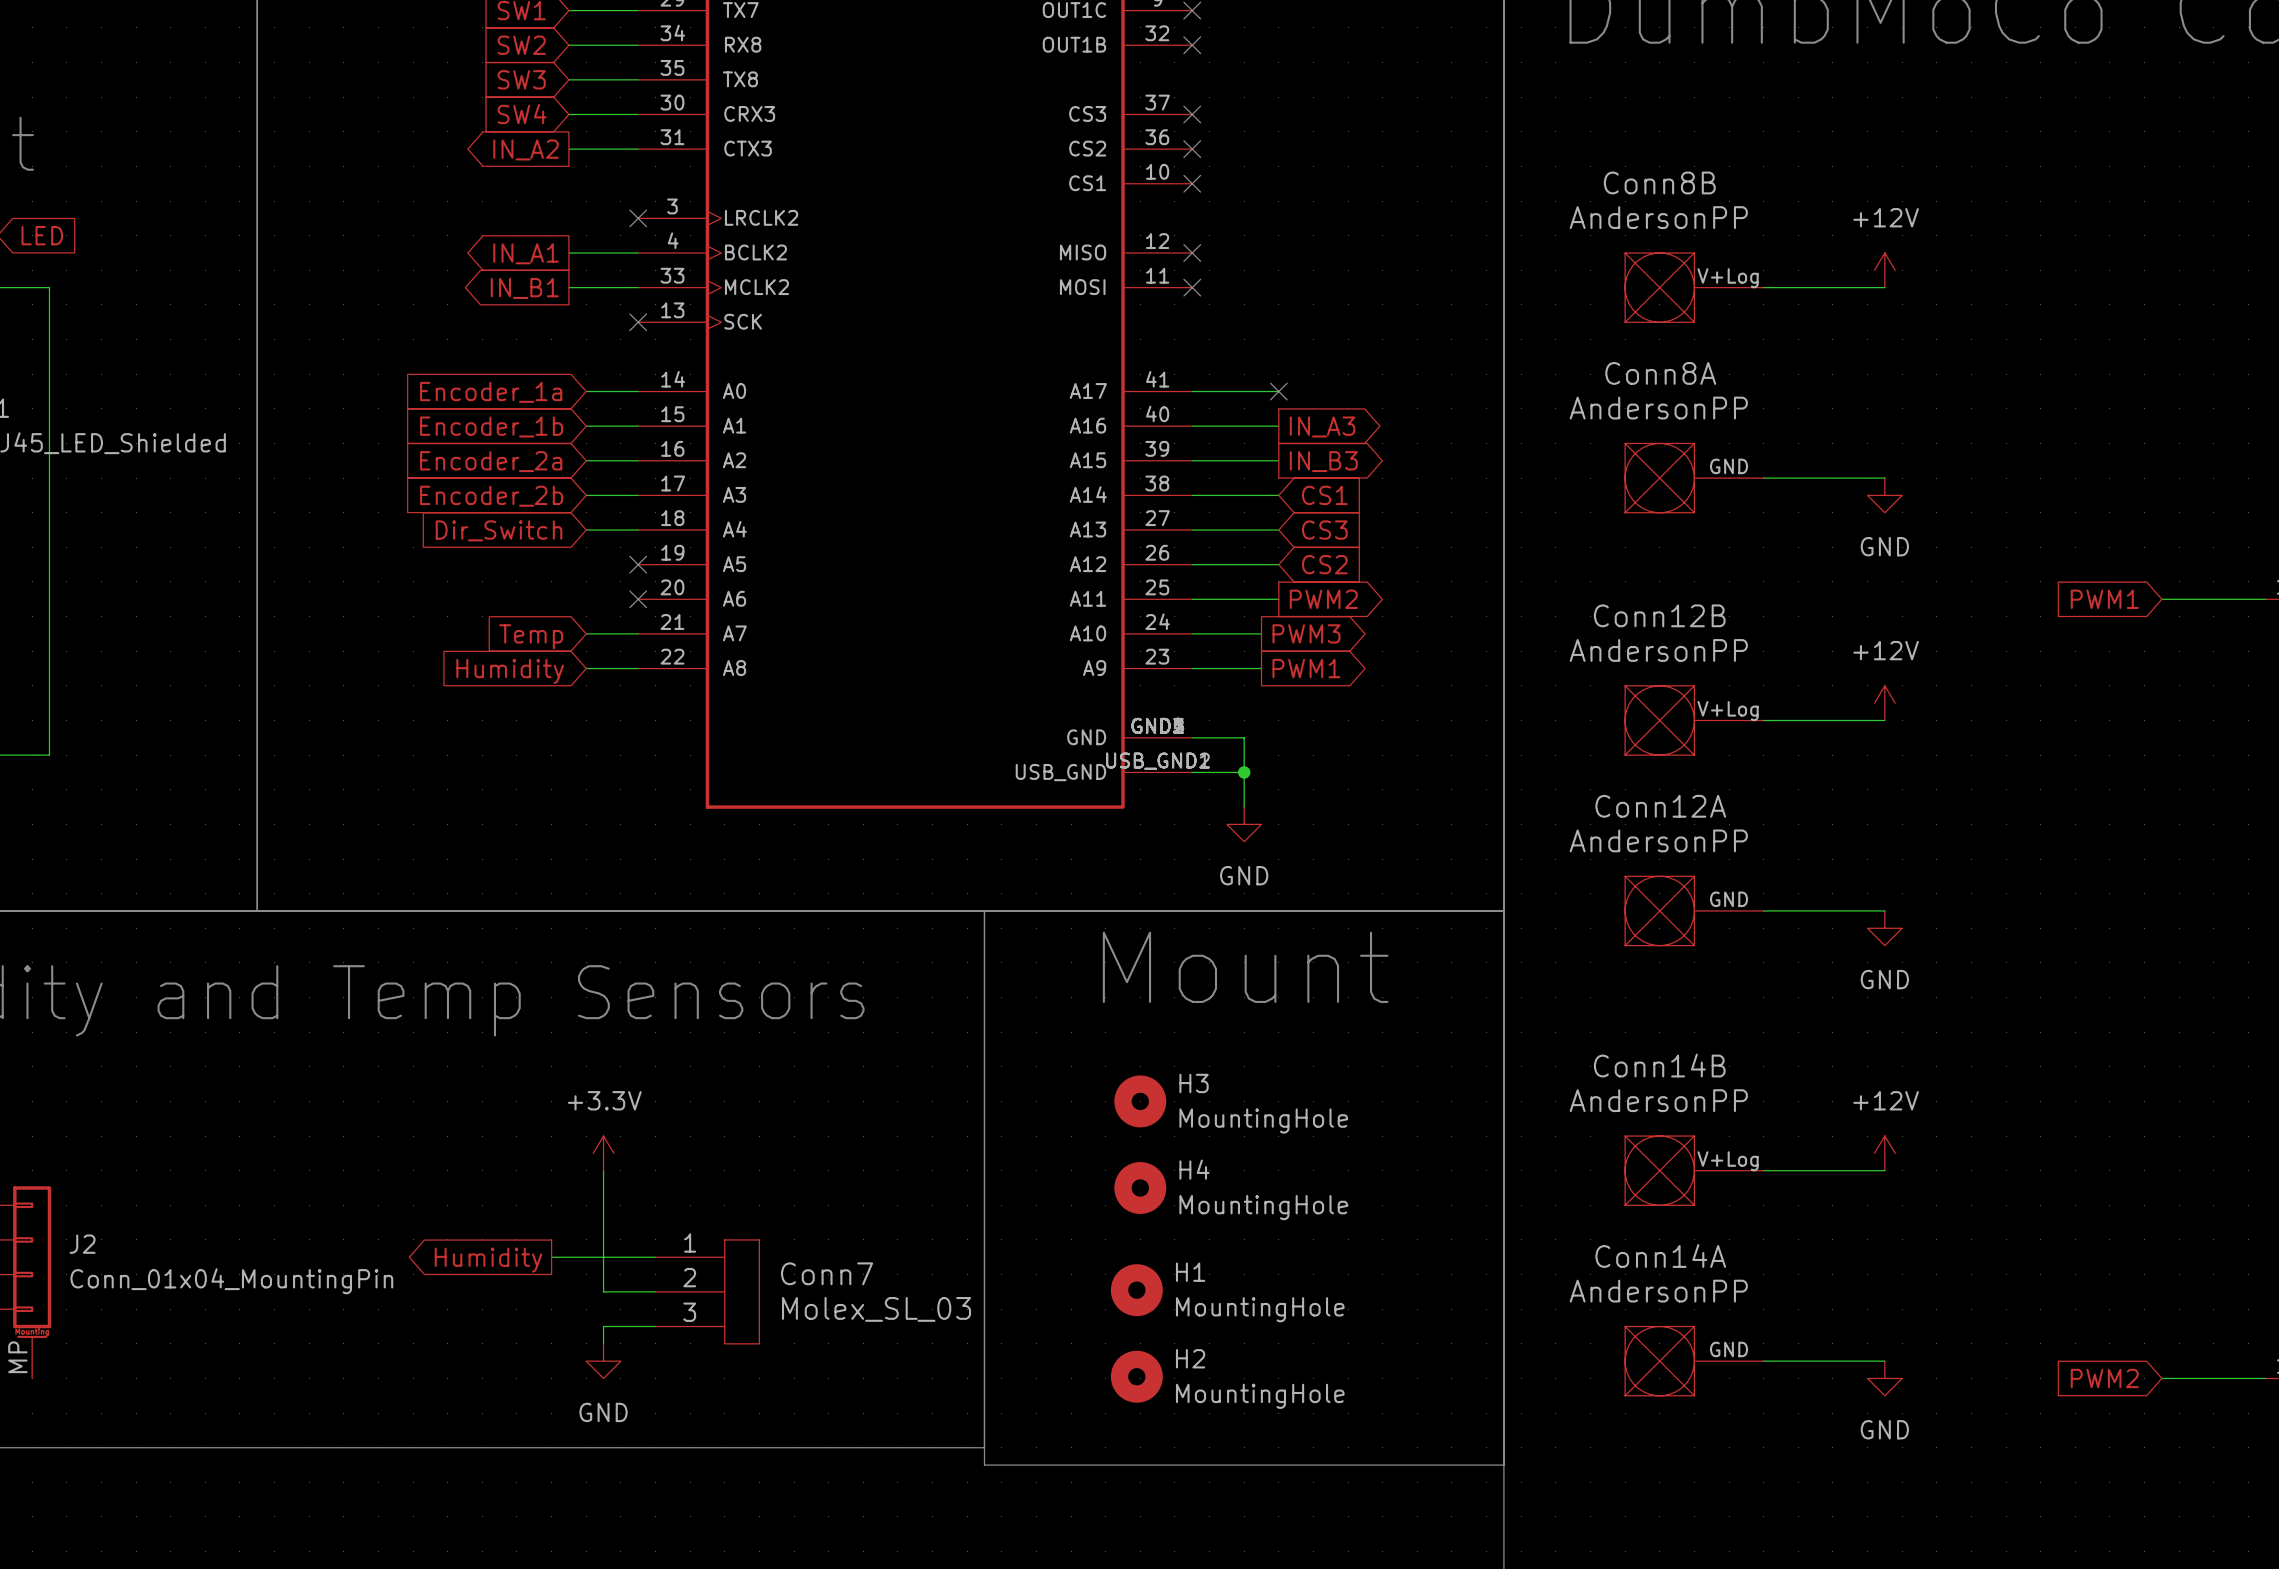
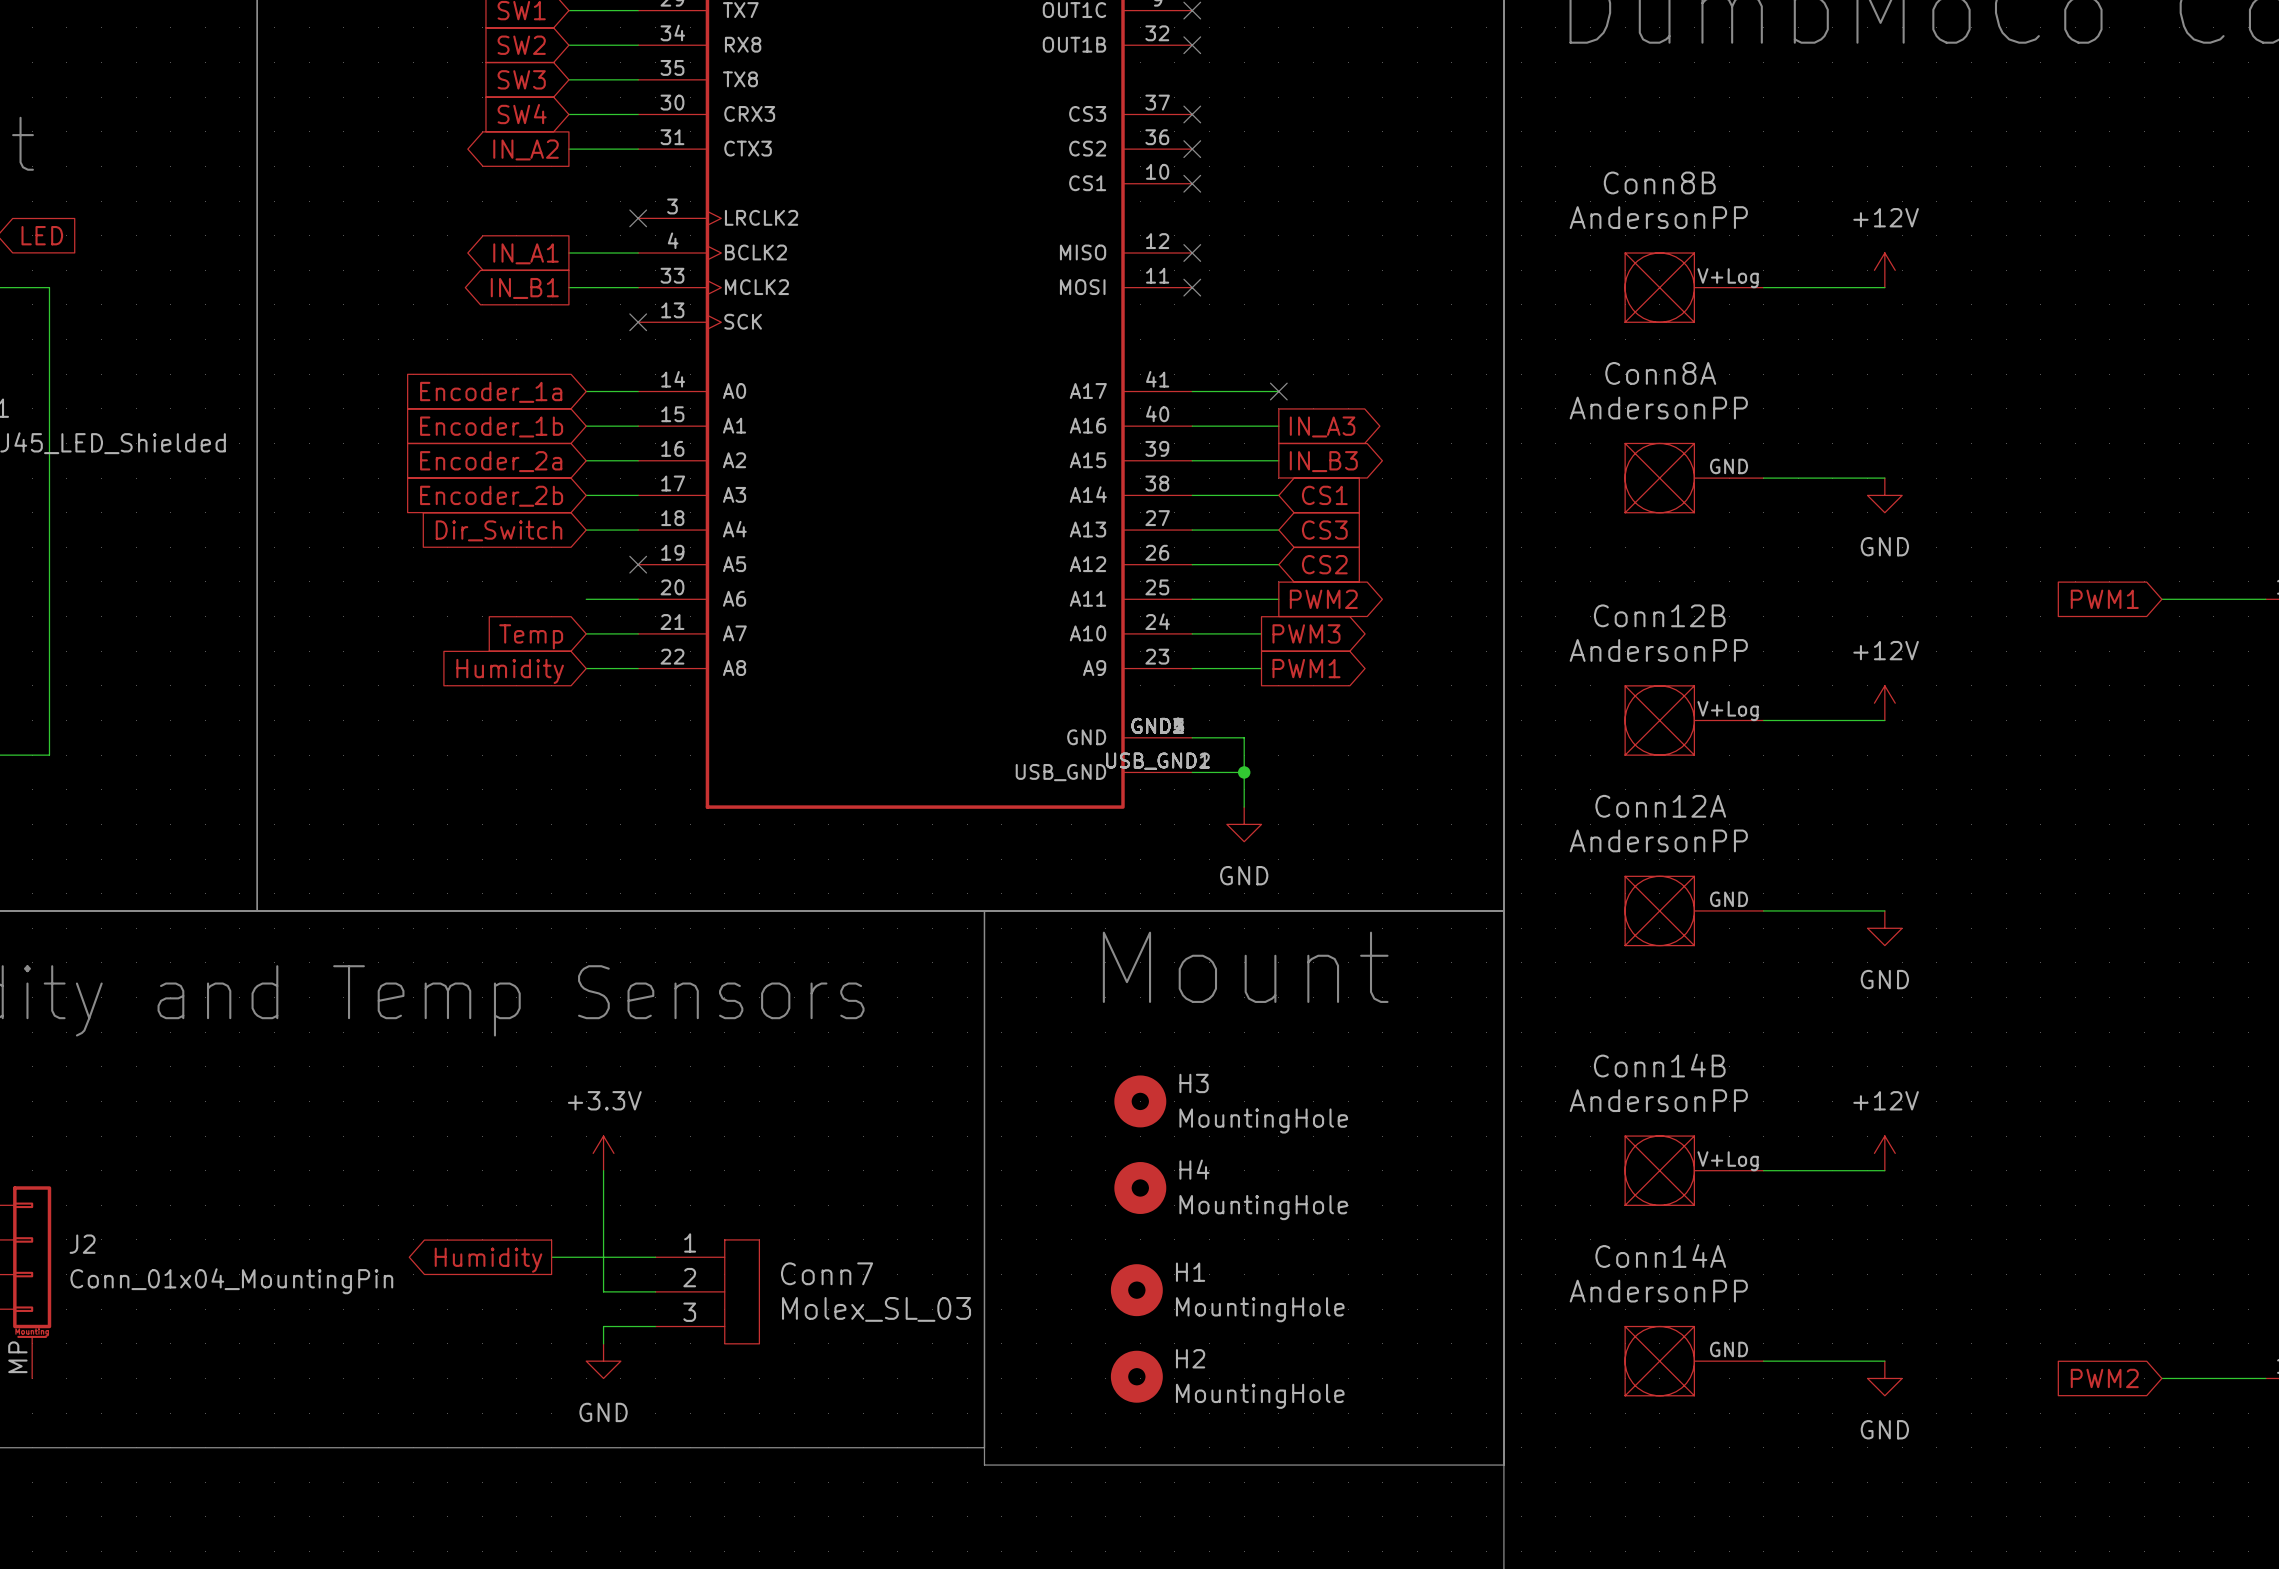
wire: none -> (586, 599) (638, 599)
no-connect mark: (638, 599) -> none

